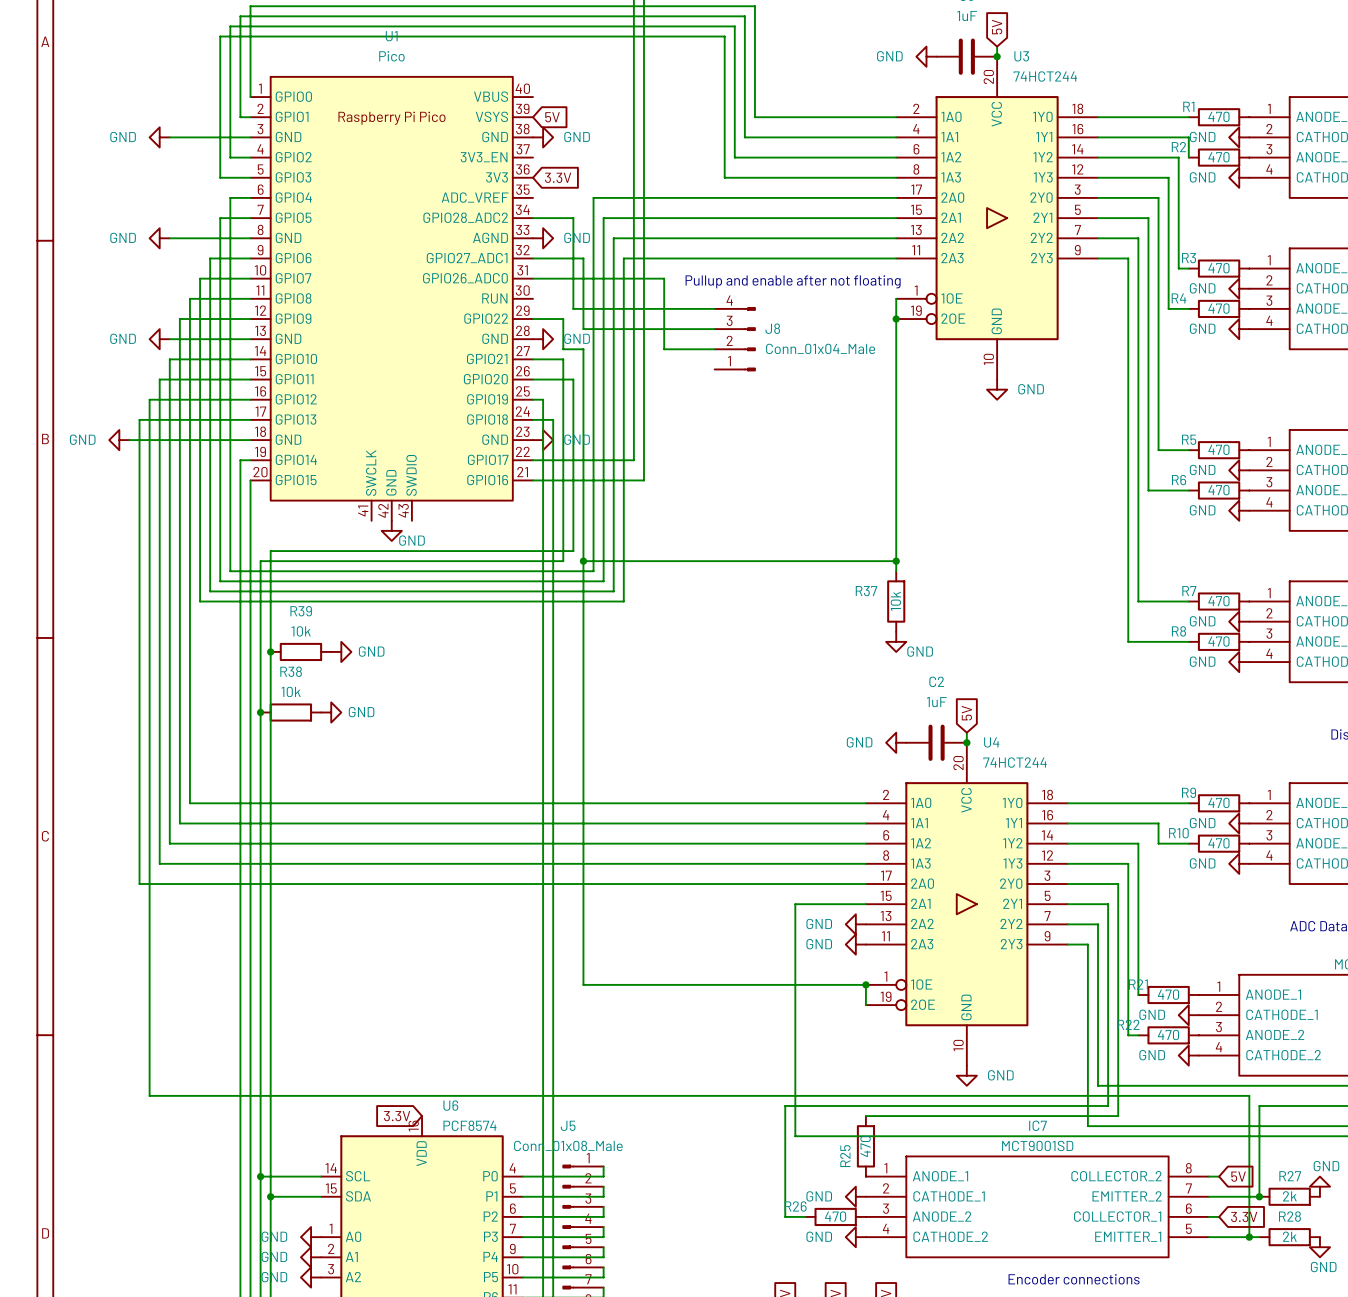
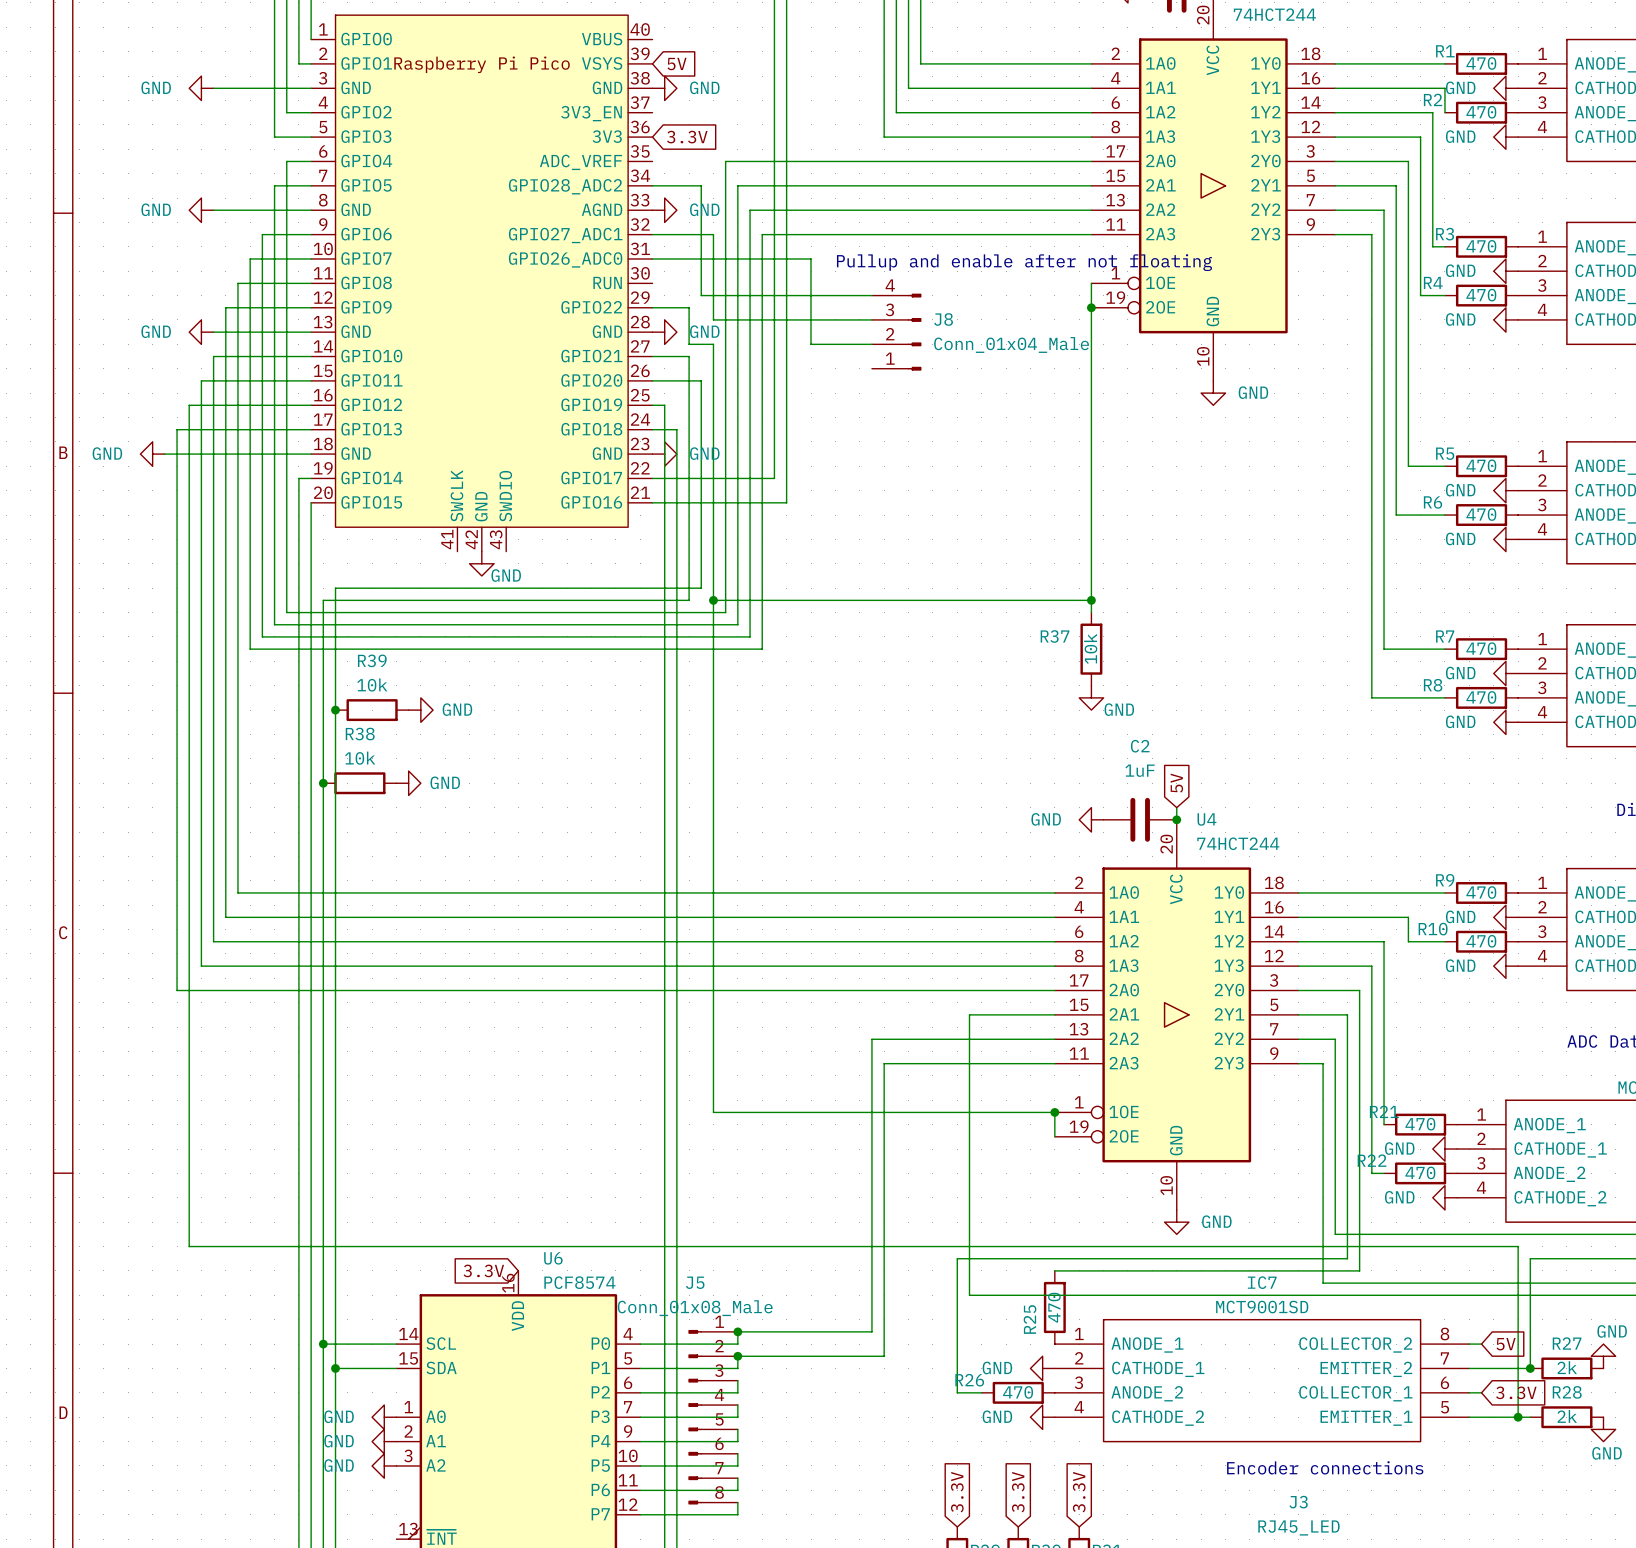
power symbol: GND (855, 924) -> none
wire: none -> (1054, 1039) (871, 1039) (871, 1331) (737, 1331)
power symbol: GND (855, 944) -> none
wire: none -> (1054, 1063) (884, 1063) (884, 1356) (737, 1356)
junction: none -> (737, 1331)
junction: none -> (737, 1356)

